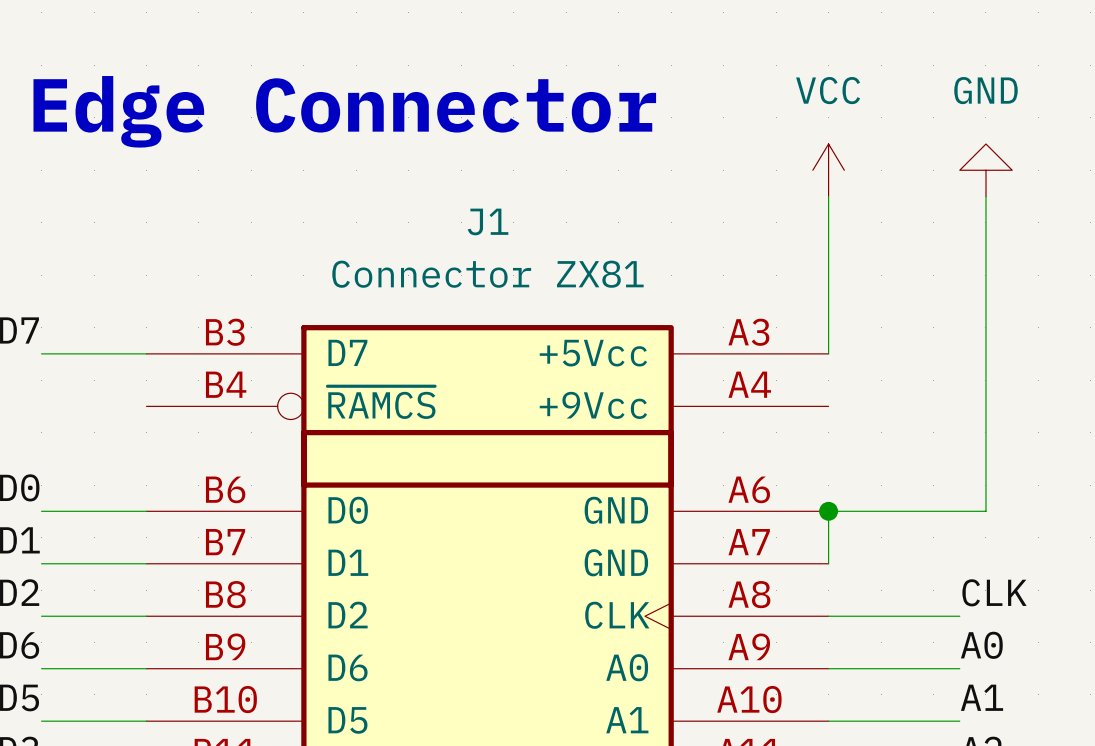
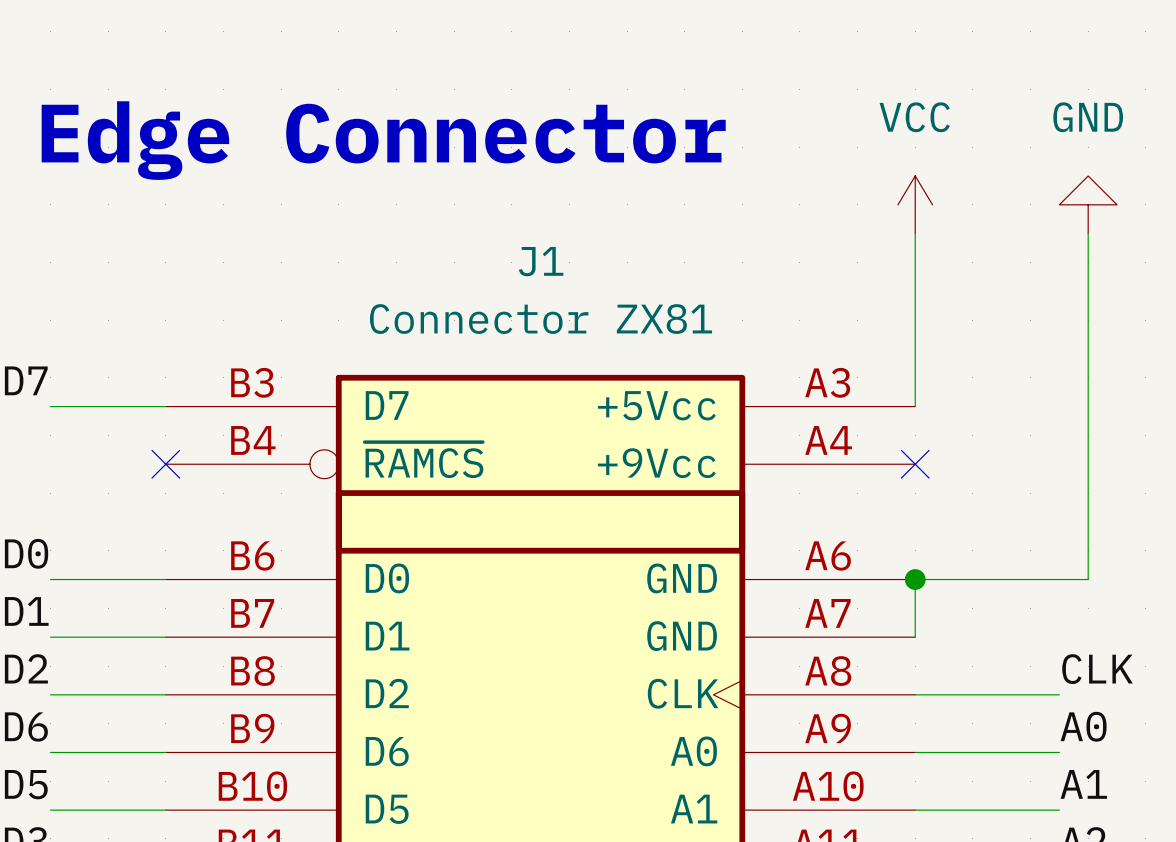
no-connect mark: none -> (165, 464)
no-connect mark: none -> (915, 464)

